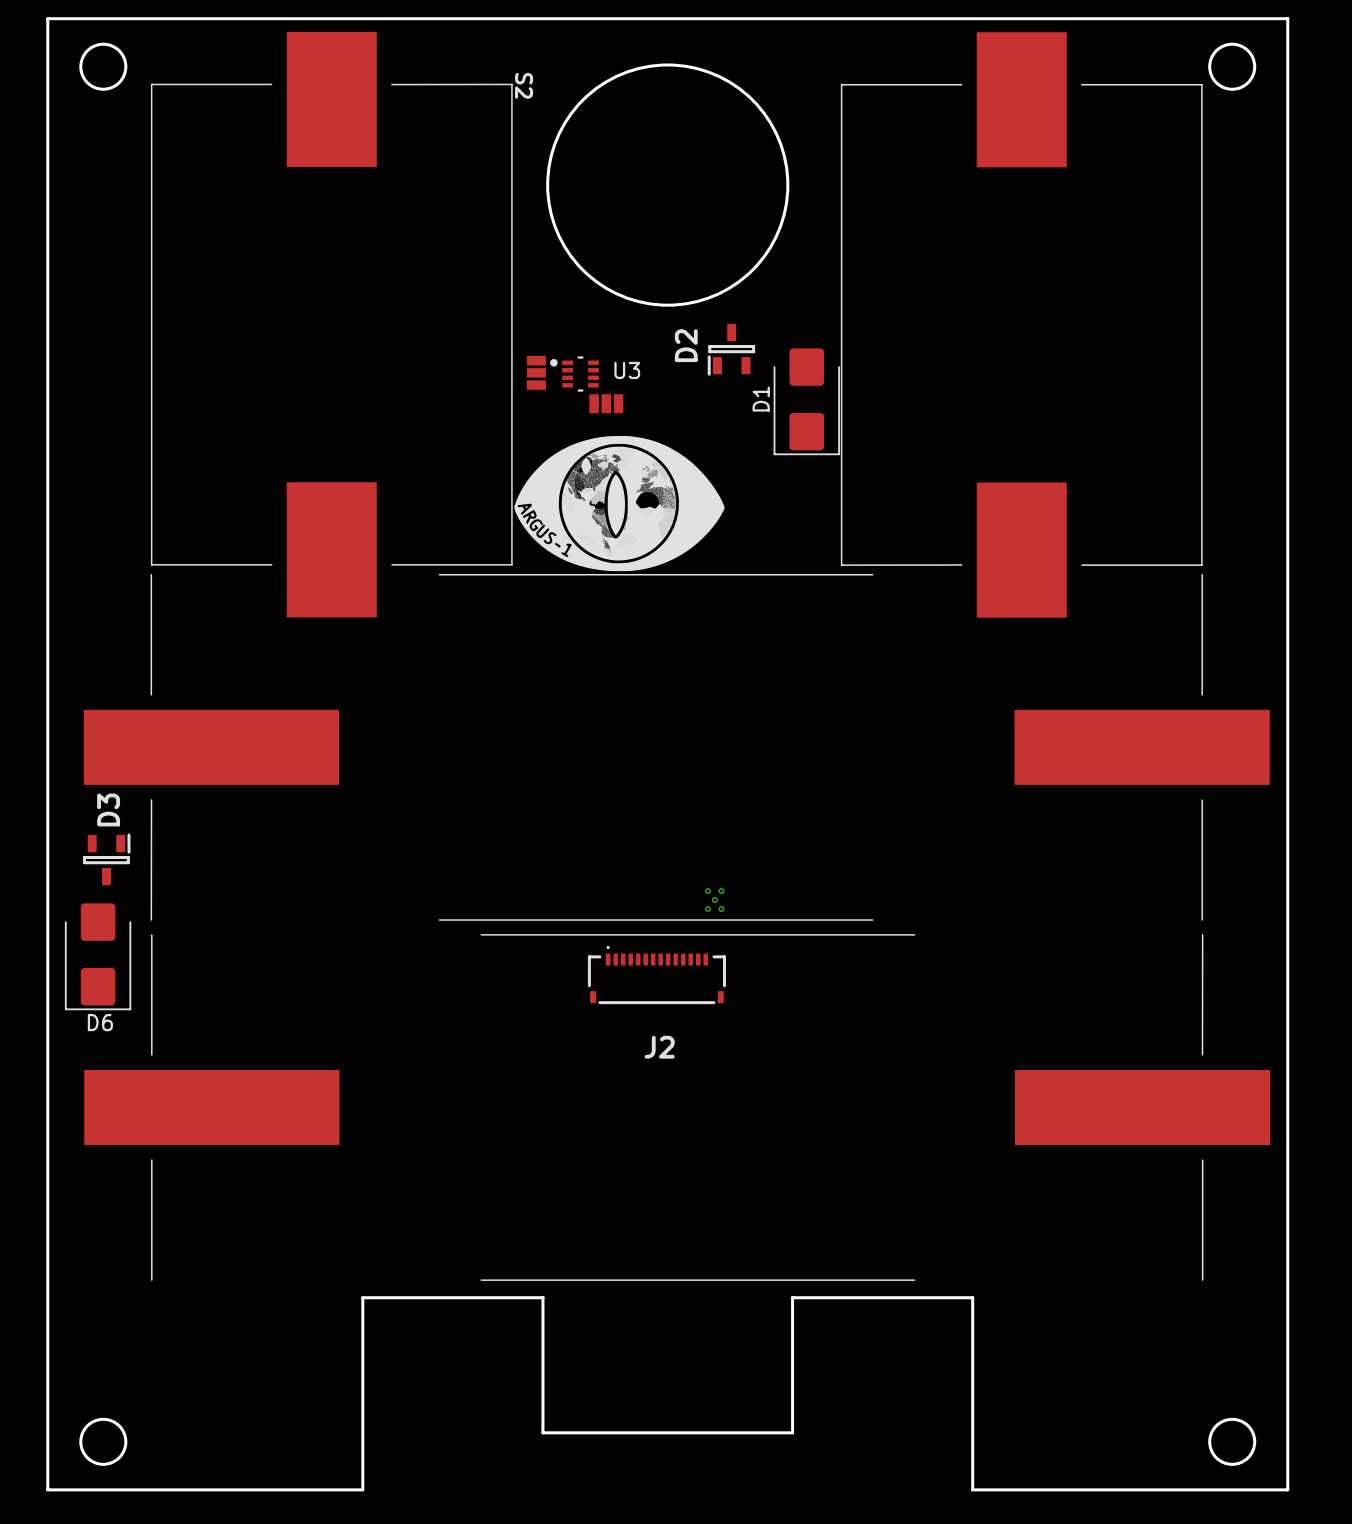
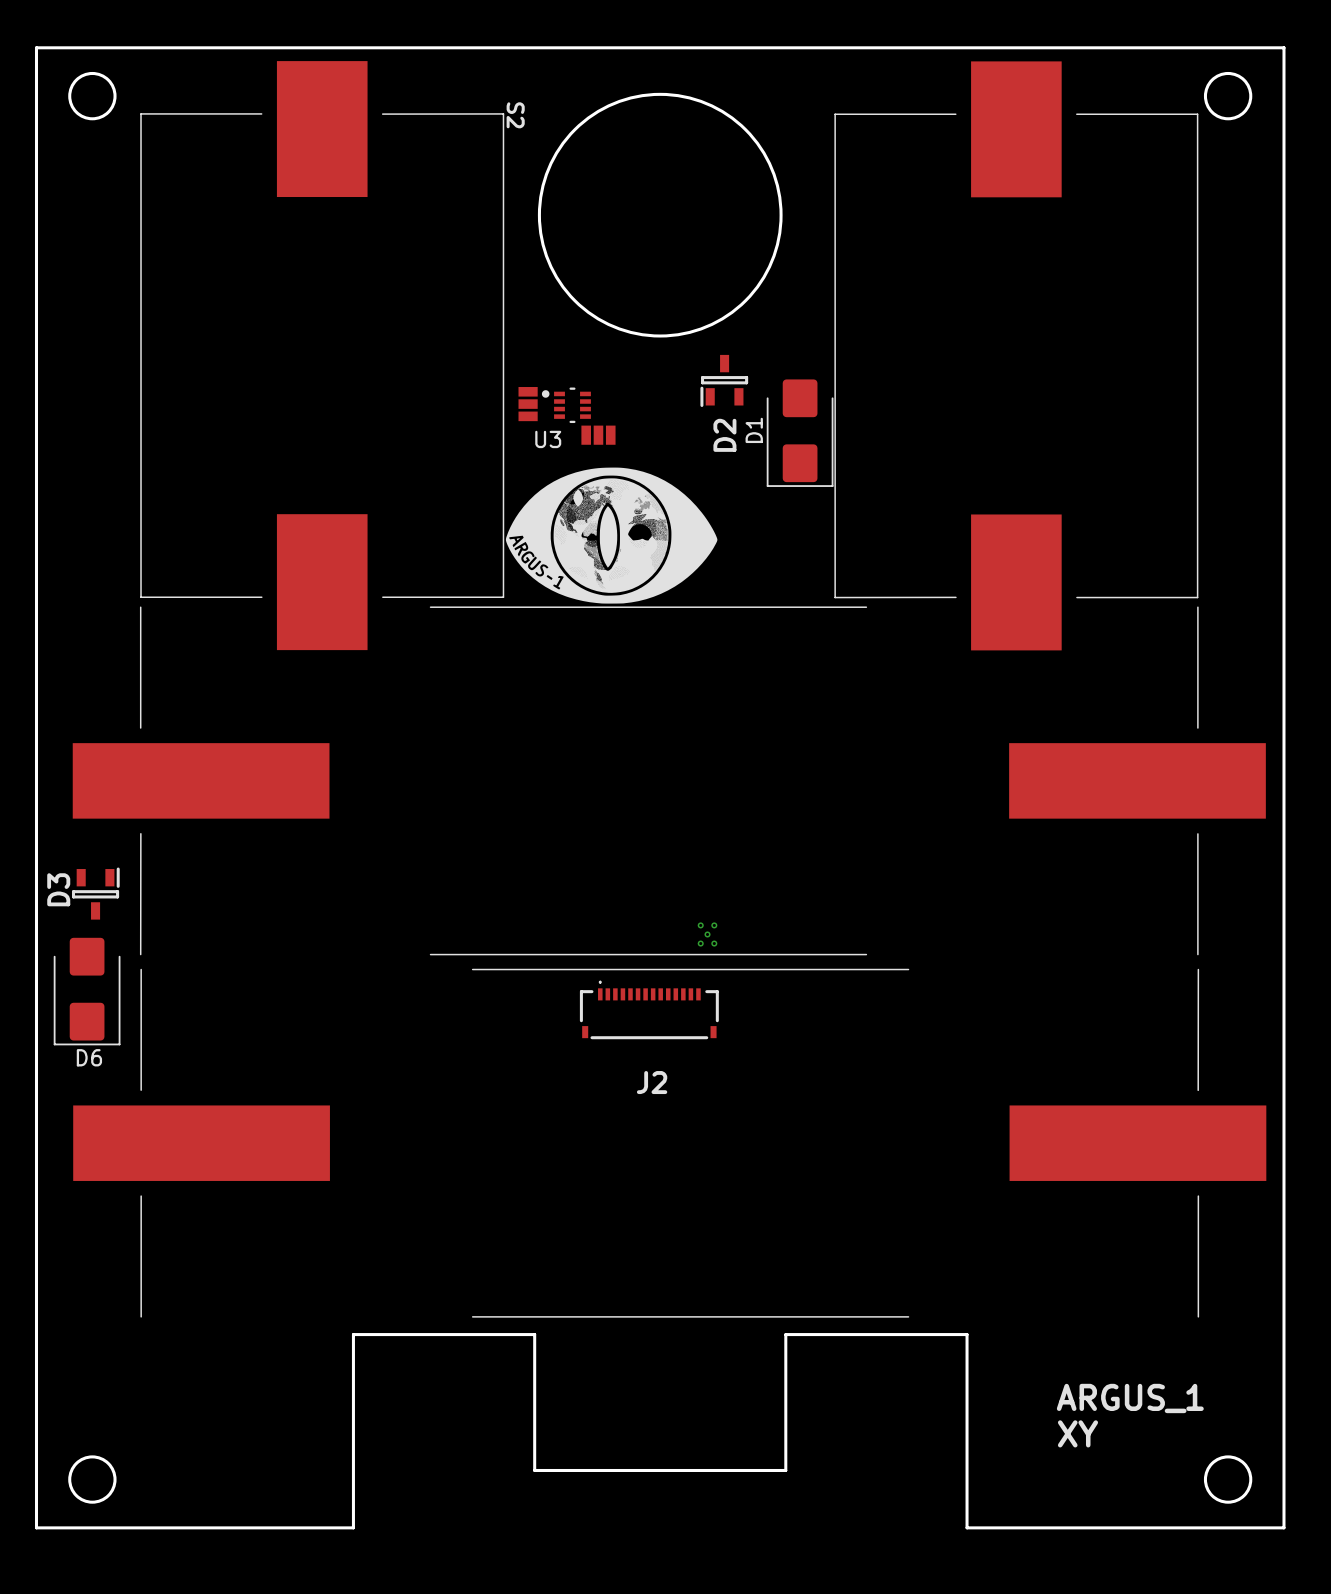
D2 name position: D2 (686, 345) -> D2 (724, 435)
U3 name position: U3 (627, 370) -> U3 (548, 439)
D3 name position: D3 (108, 809) -> D3 (58, 889)
text: none -> ARGUS_1 (1130, 1398)
text: none -> XY (1077, 1433)

